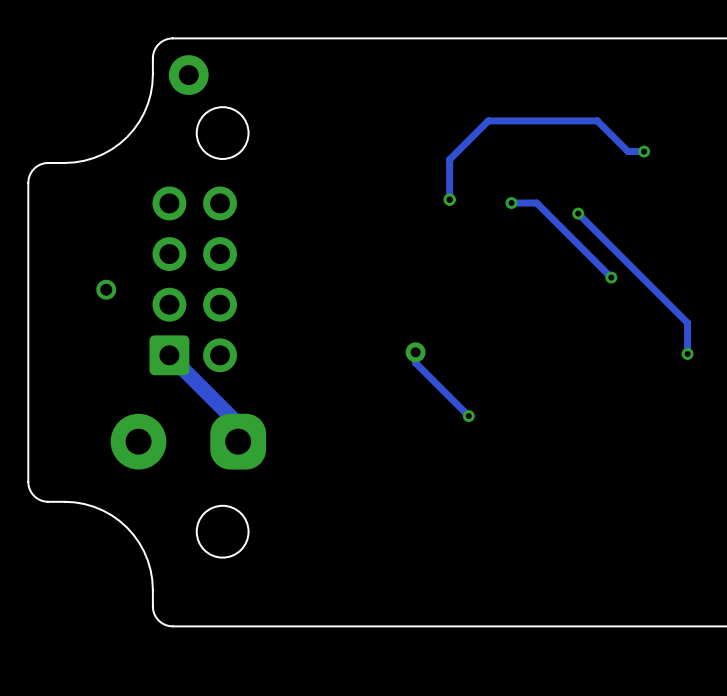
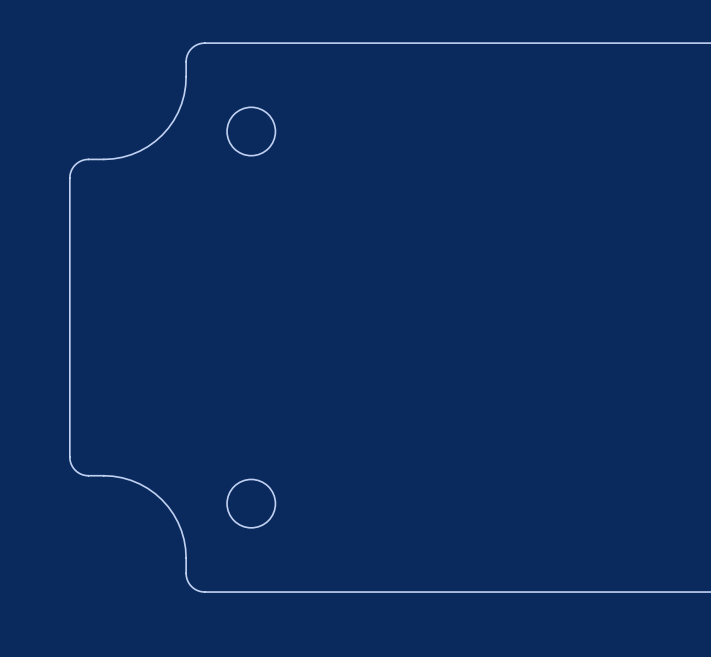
part: (188, 75) -> none
track: (644, 151) (628, 151) (597, 120) (488, 120) (449, 159) (449, 199) -> none
via: (644, 151) -> none
via: (449, 199) -> none
track: (511, 203) (536, 203) (611, 277) -> none
via: (511, 203) -> none
track: (578, 213) (687, 322) (687, 354) -> none
via: (578, 213) -> none
via: (611, 277) -> none
part: (193, 280) -> none
via: (106, 289) -> none
track: (415, 352) (415, 362) (468, 416) -> none
part: (415, 352) -> none
via: (687, 354) -> none
track: (169, 355) (238, 424) (238, 441) -> none
via: (468, 416) -> none
part: (188, 441) -> none

